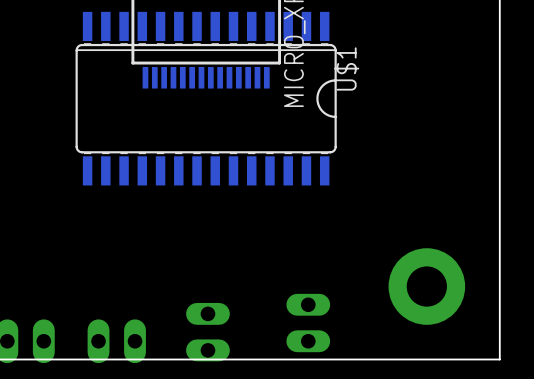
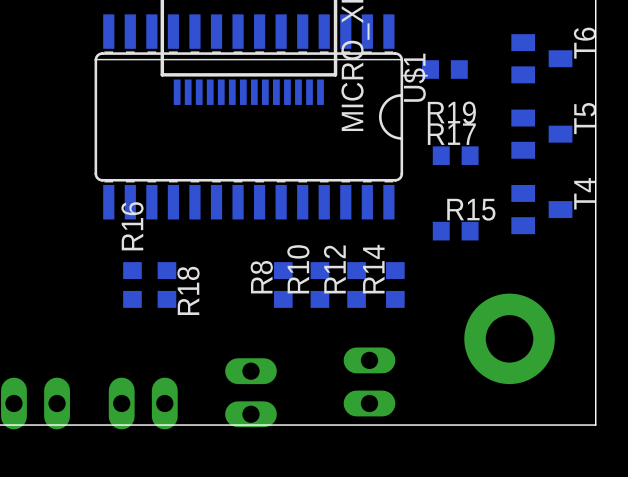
T6: none -> (541, 58)
R19: none -> (444, 69)
T5: none -> (541, 134)
R17: none -> (455, 155)
T4: none -> (541, 209)
R15: none -> (455, 231)
R16: none -> (132, 284)
R18: none -> (166, 284)
R8: none -> (283, 284)
R10: none -> (319, 284)
R12: none -> (356, 284)
R14: none -> (395, 284)

